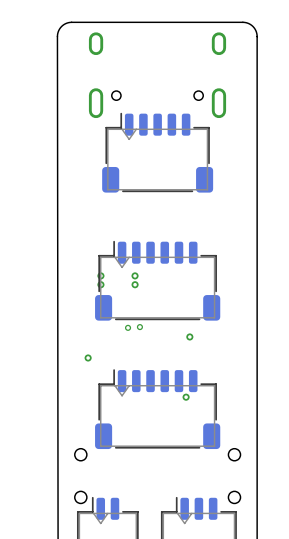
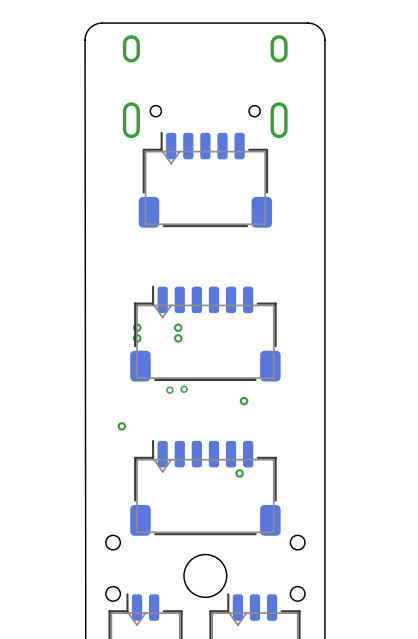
round board edge: none -> [183, 554, 227, 598]

